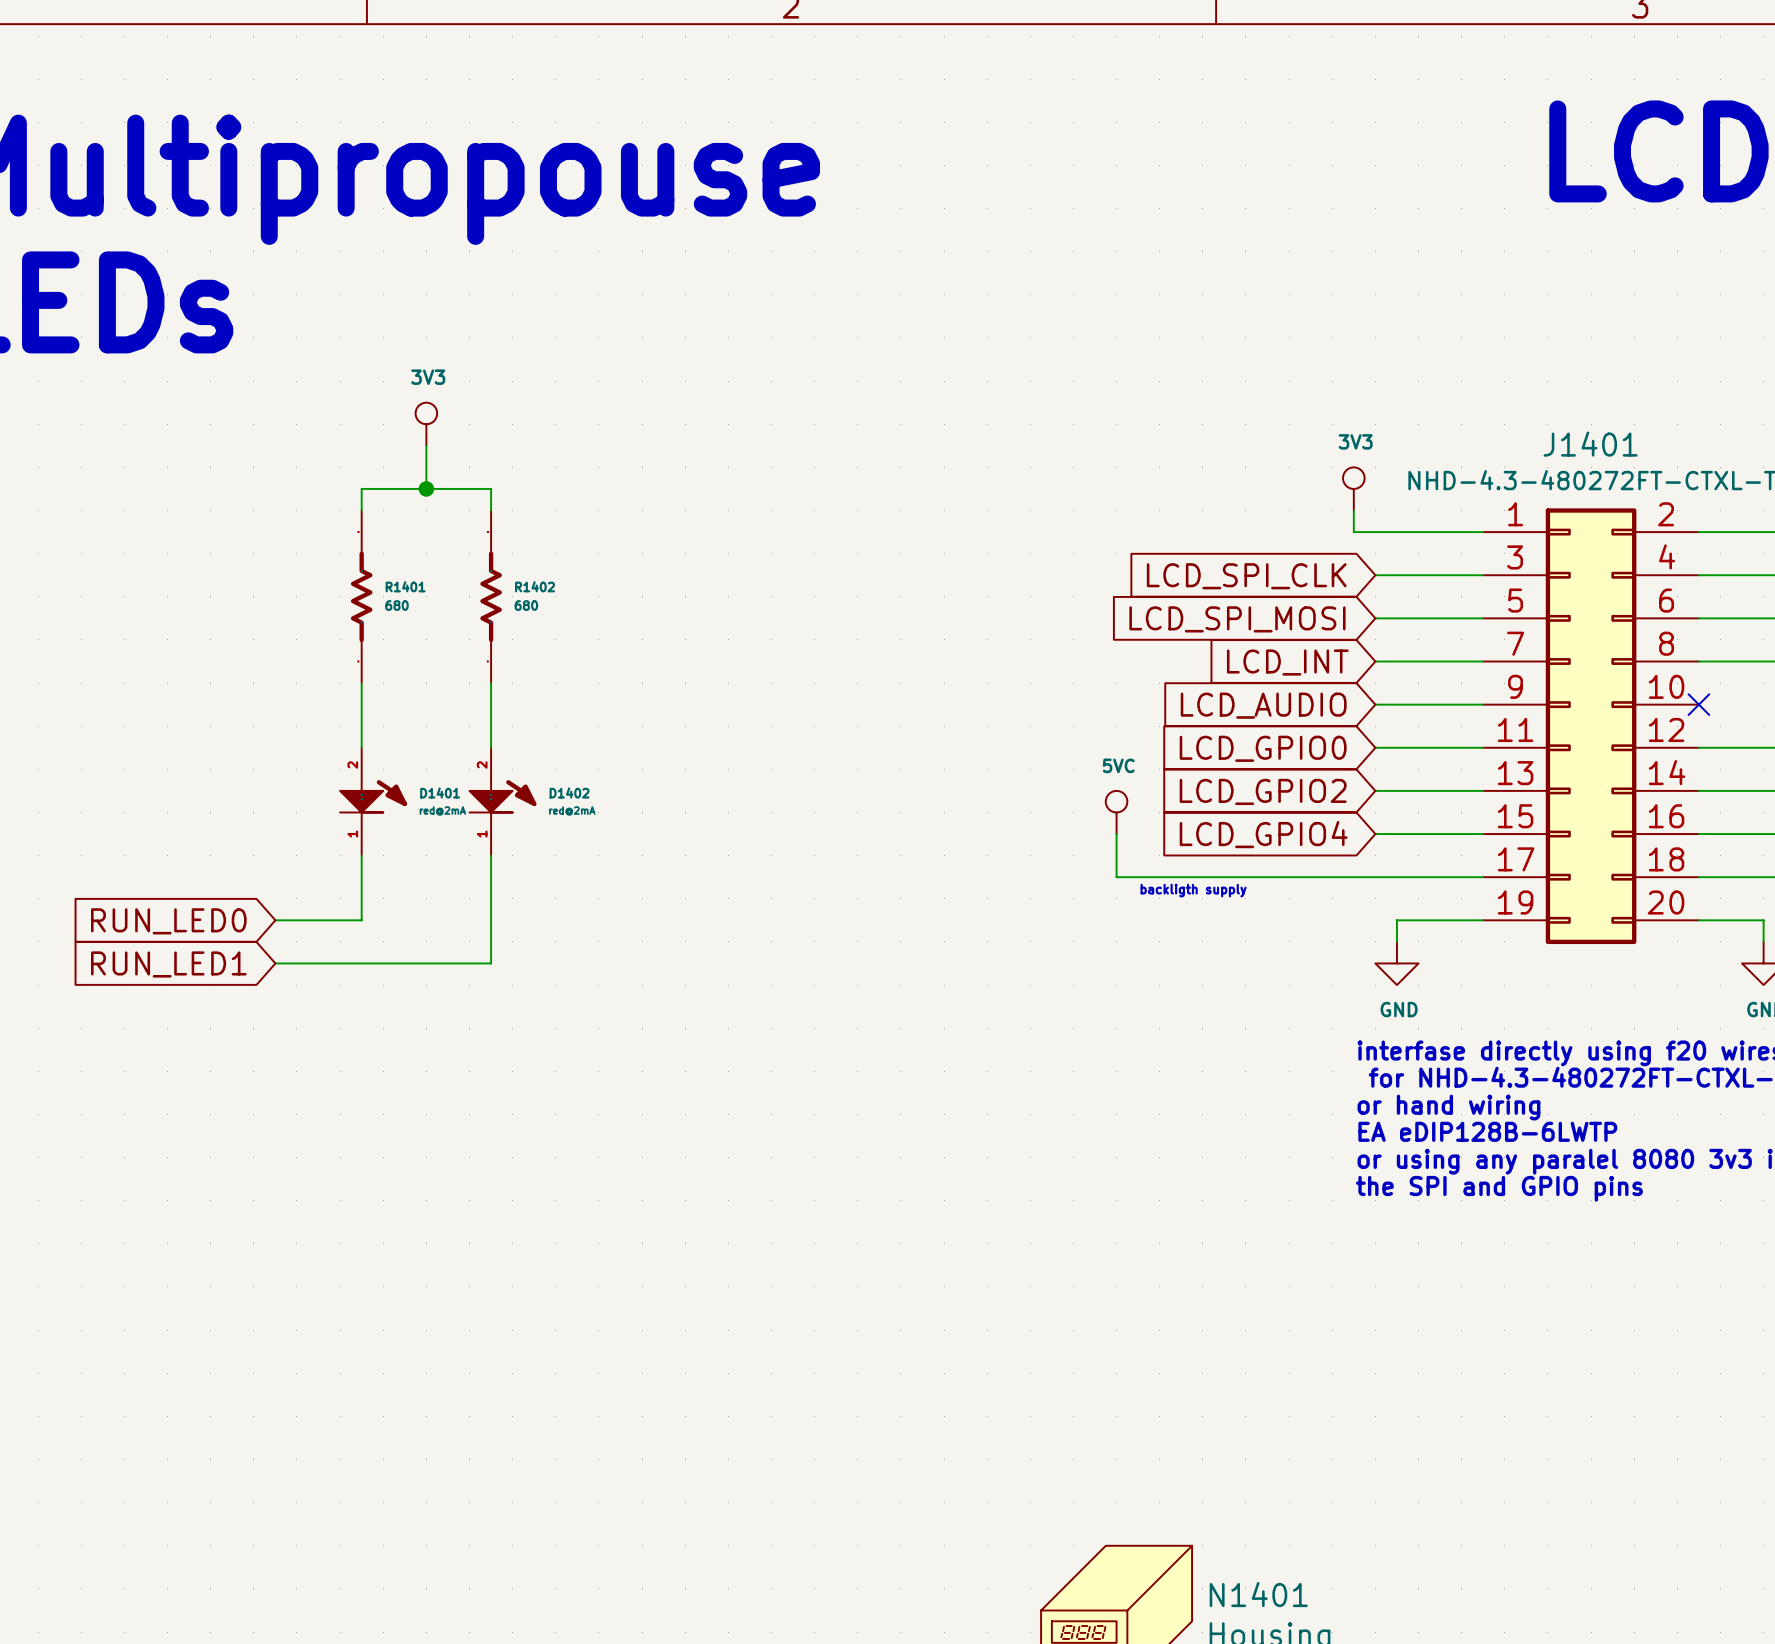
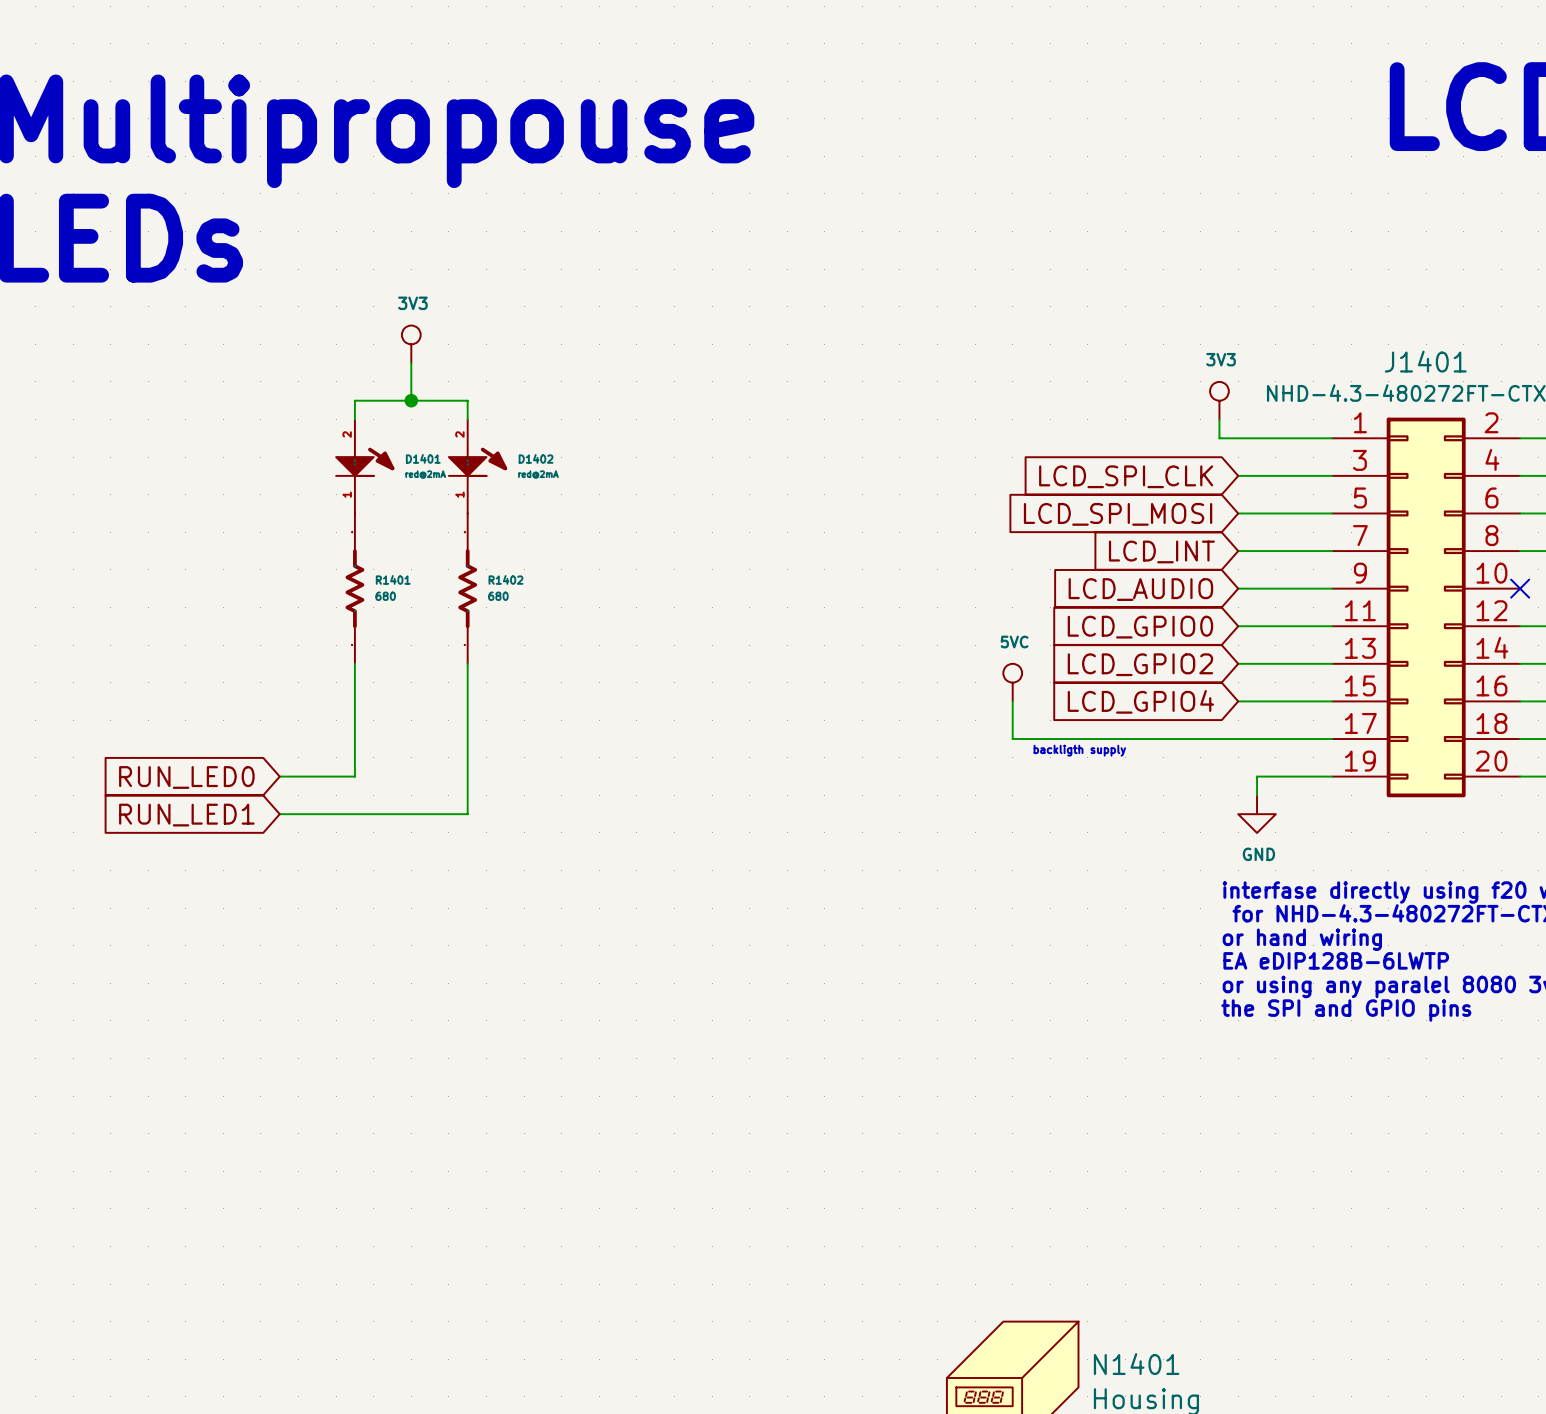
R1401 position: (361, 596) -> (354, 588)
R1402 position: (491, 596) -> (467, 588)
D1401 position: (373, 801) -> (365, 466)
D1402 position: (502, 801) -> (478, 466)

